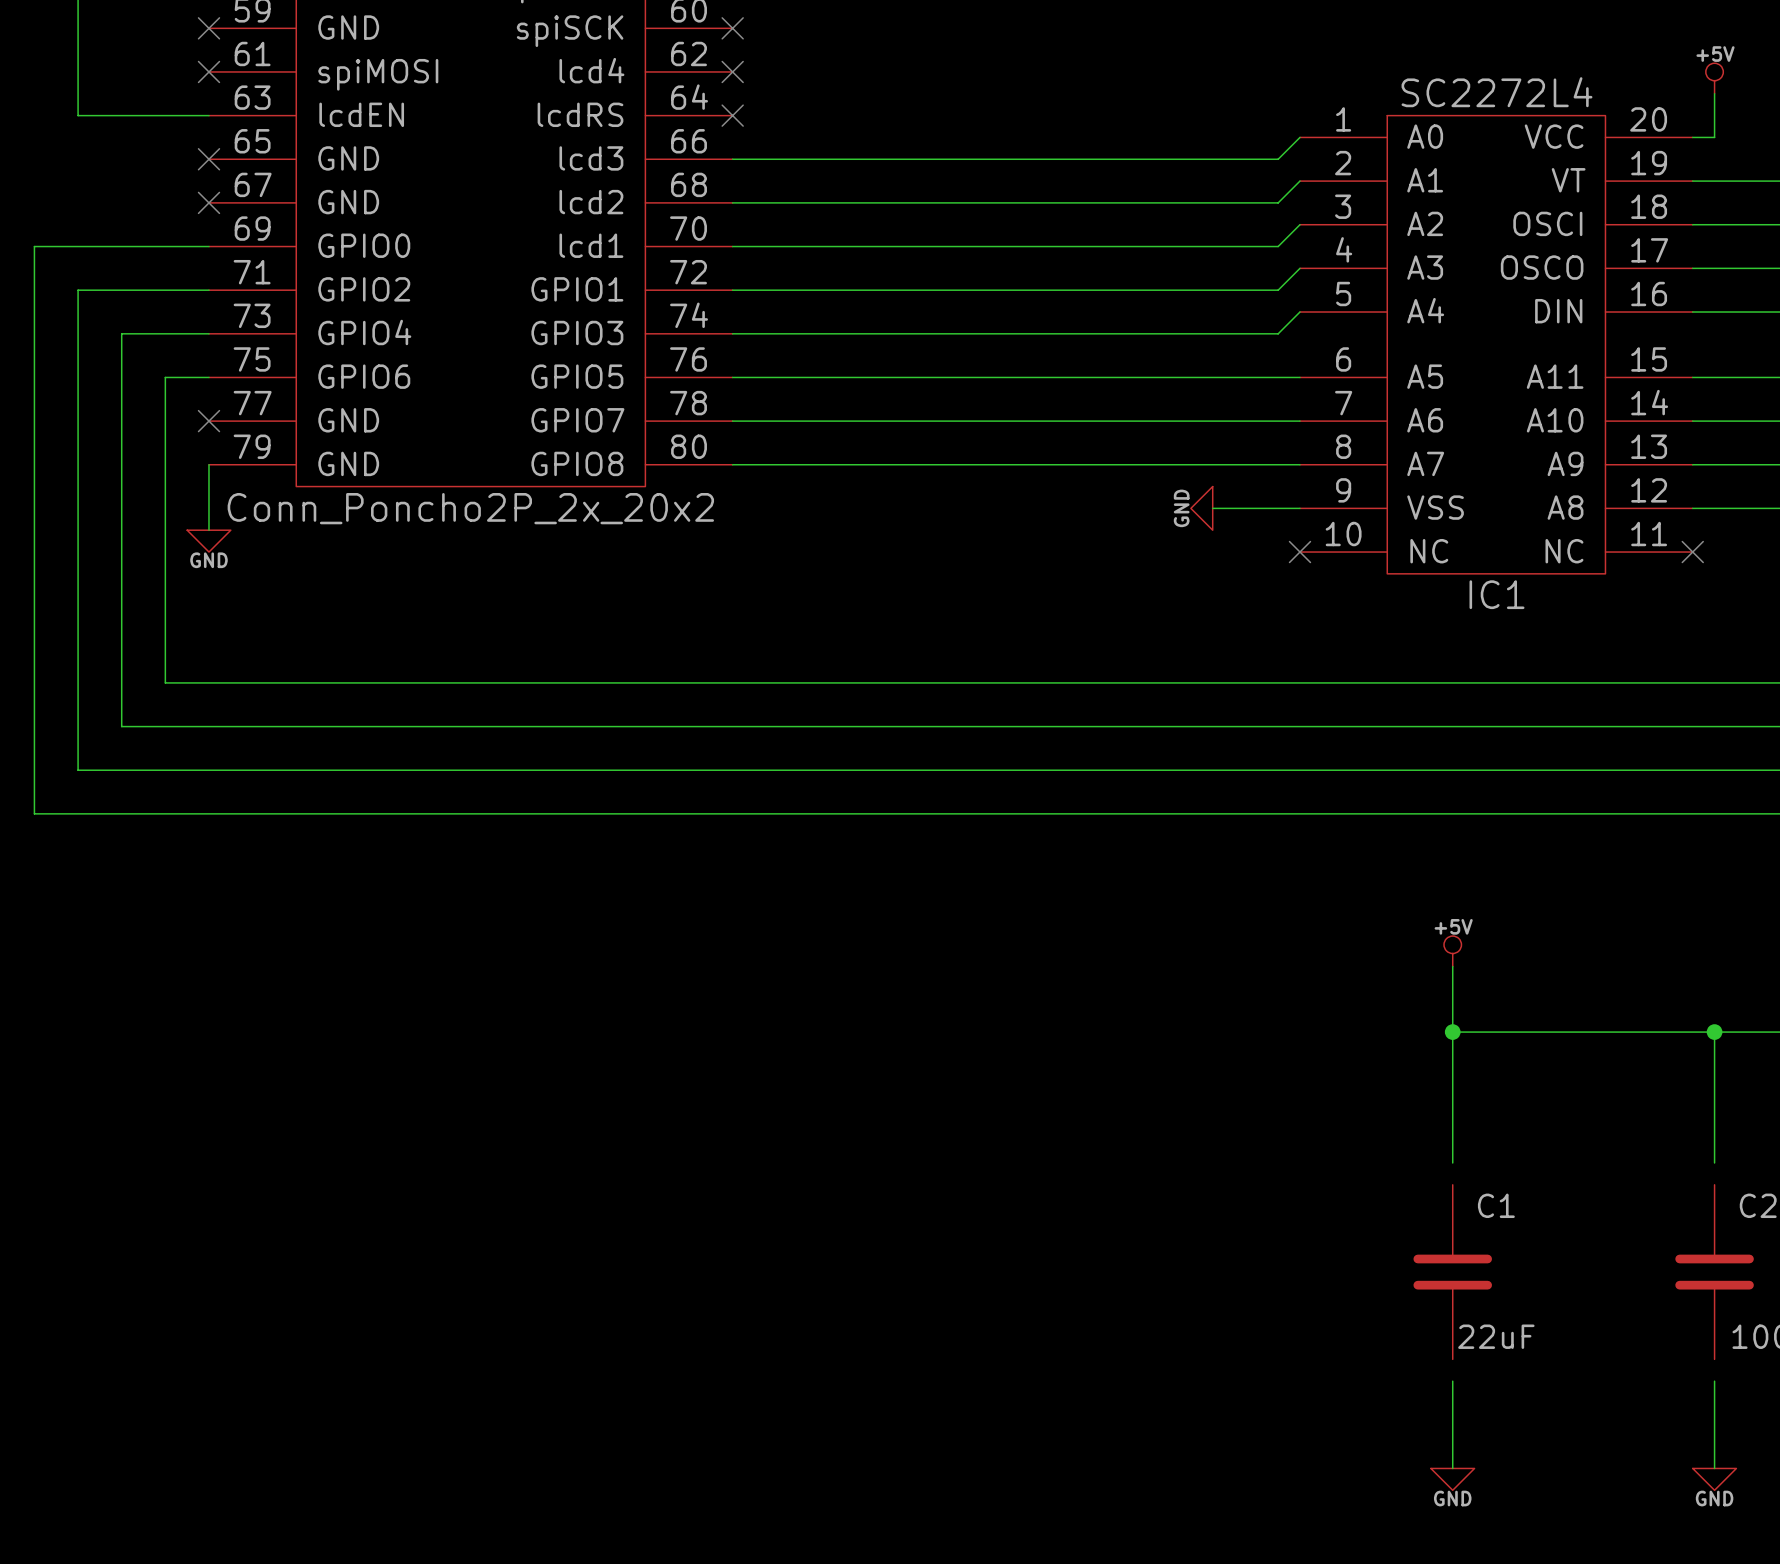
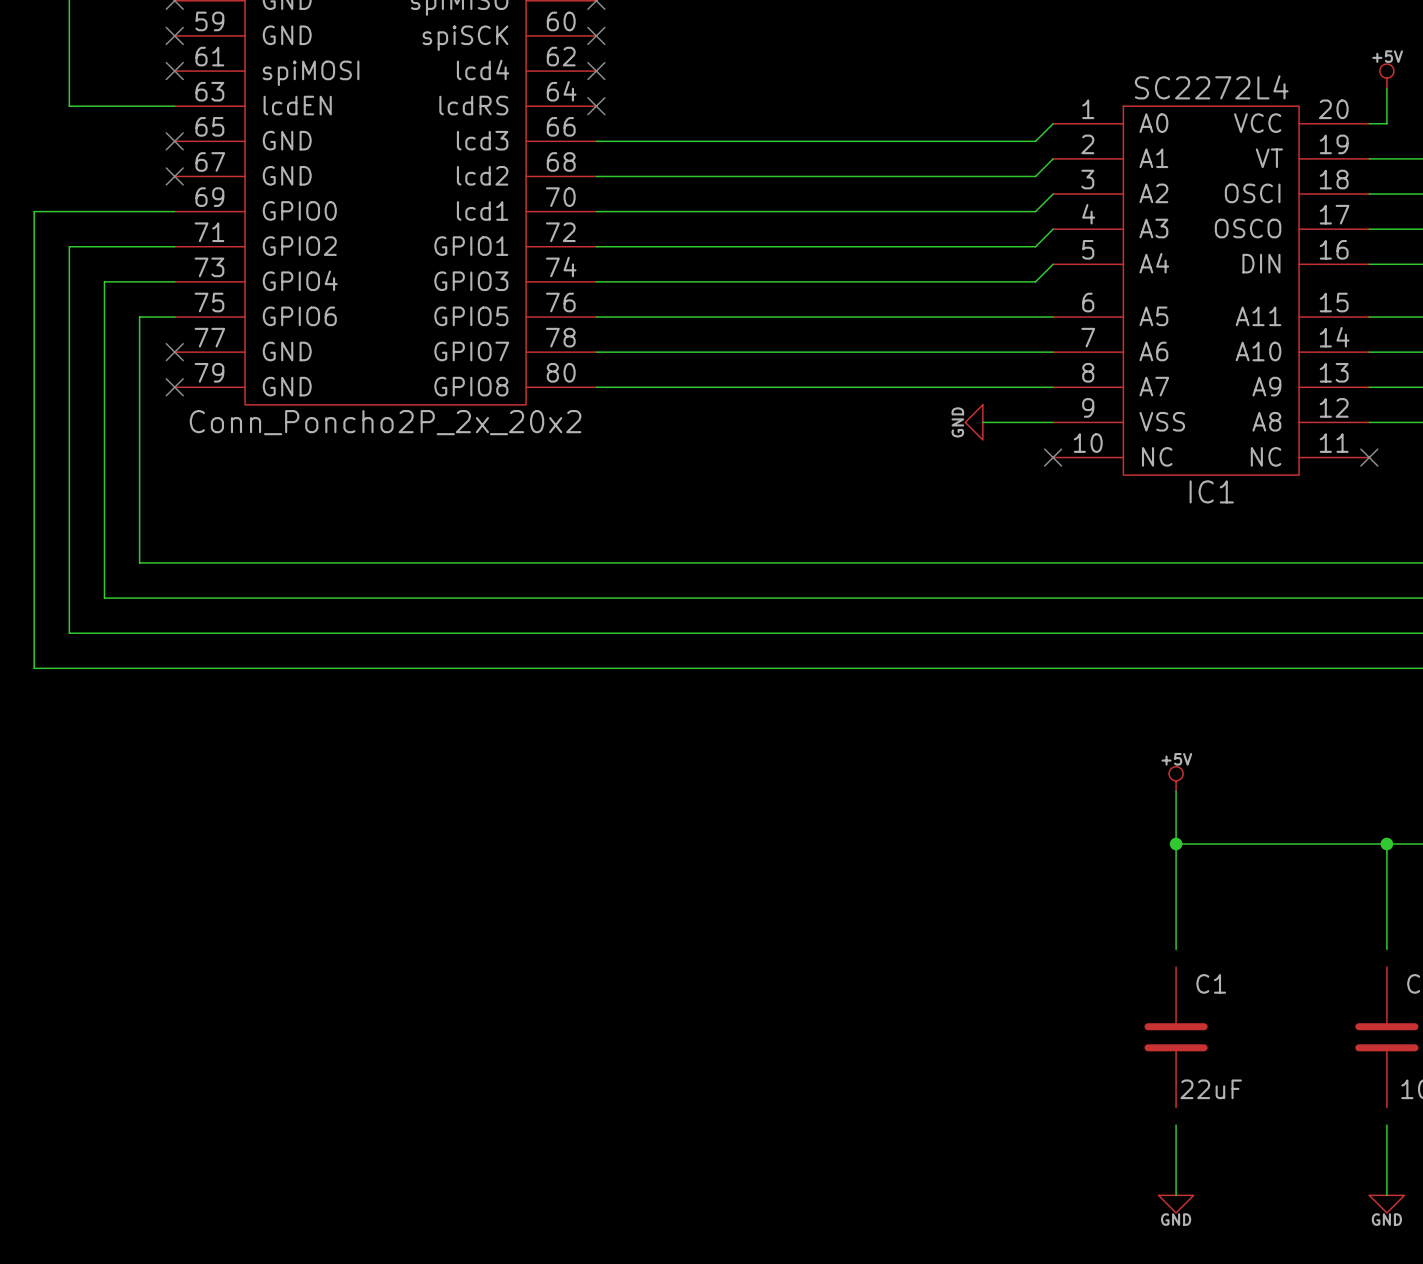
wire: (208, 464) (208, 530) -> none
no-connect mark: none -> (174, 387)
power symbol: GND (208, 541) -> none

